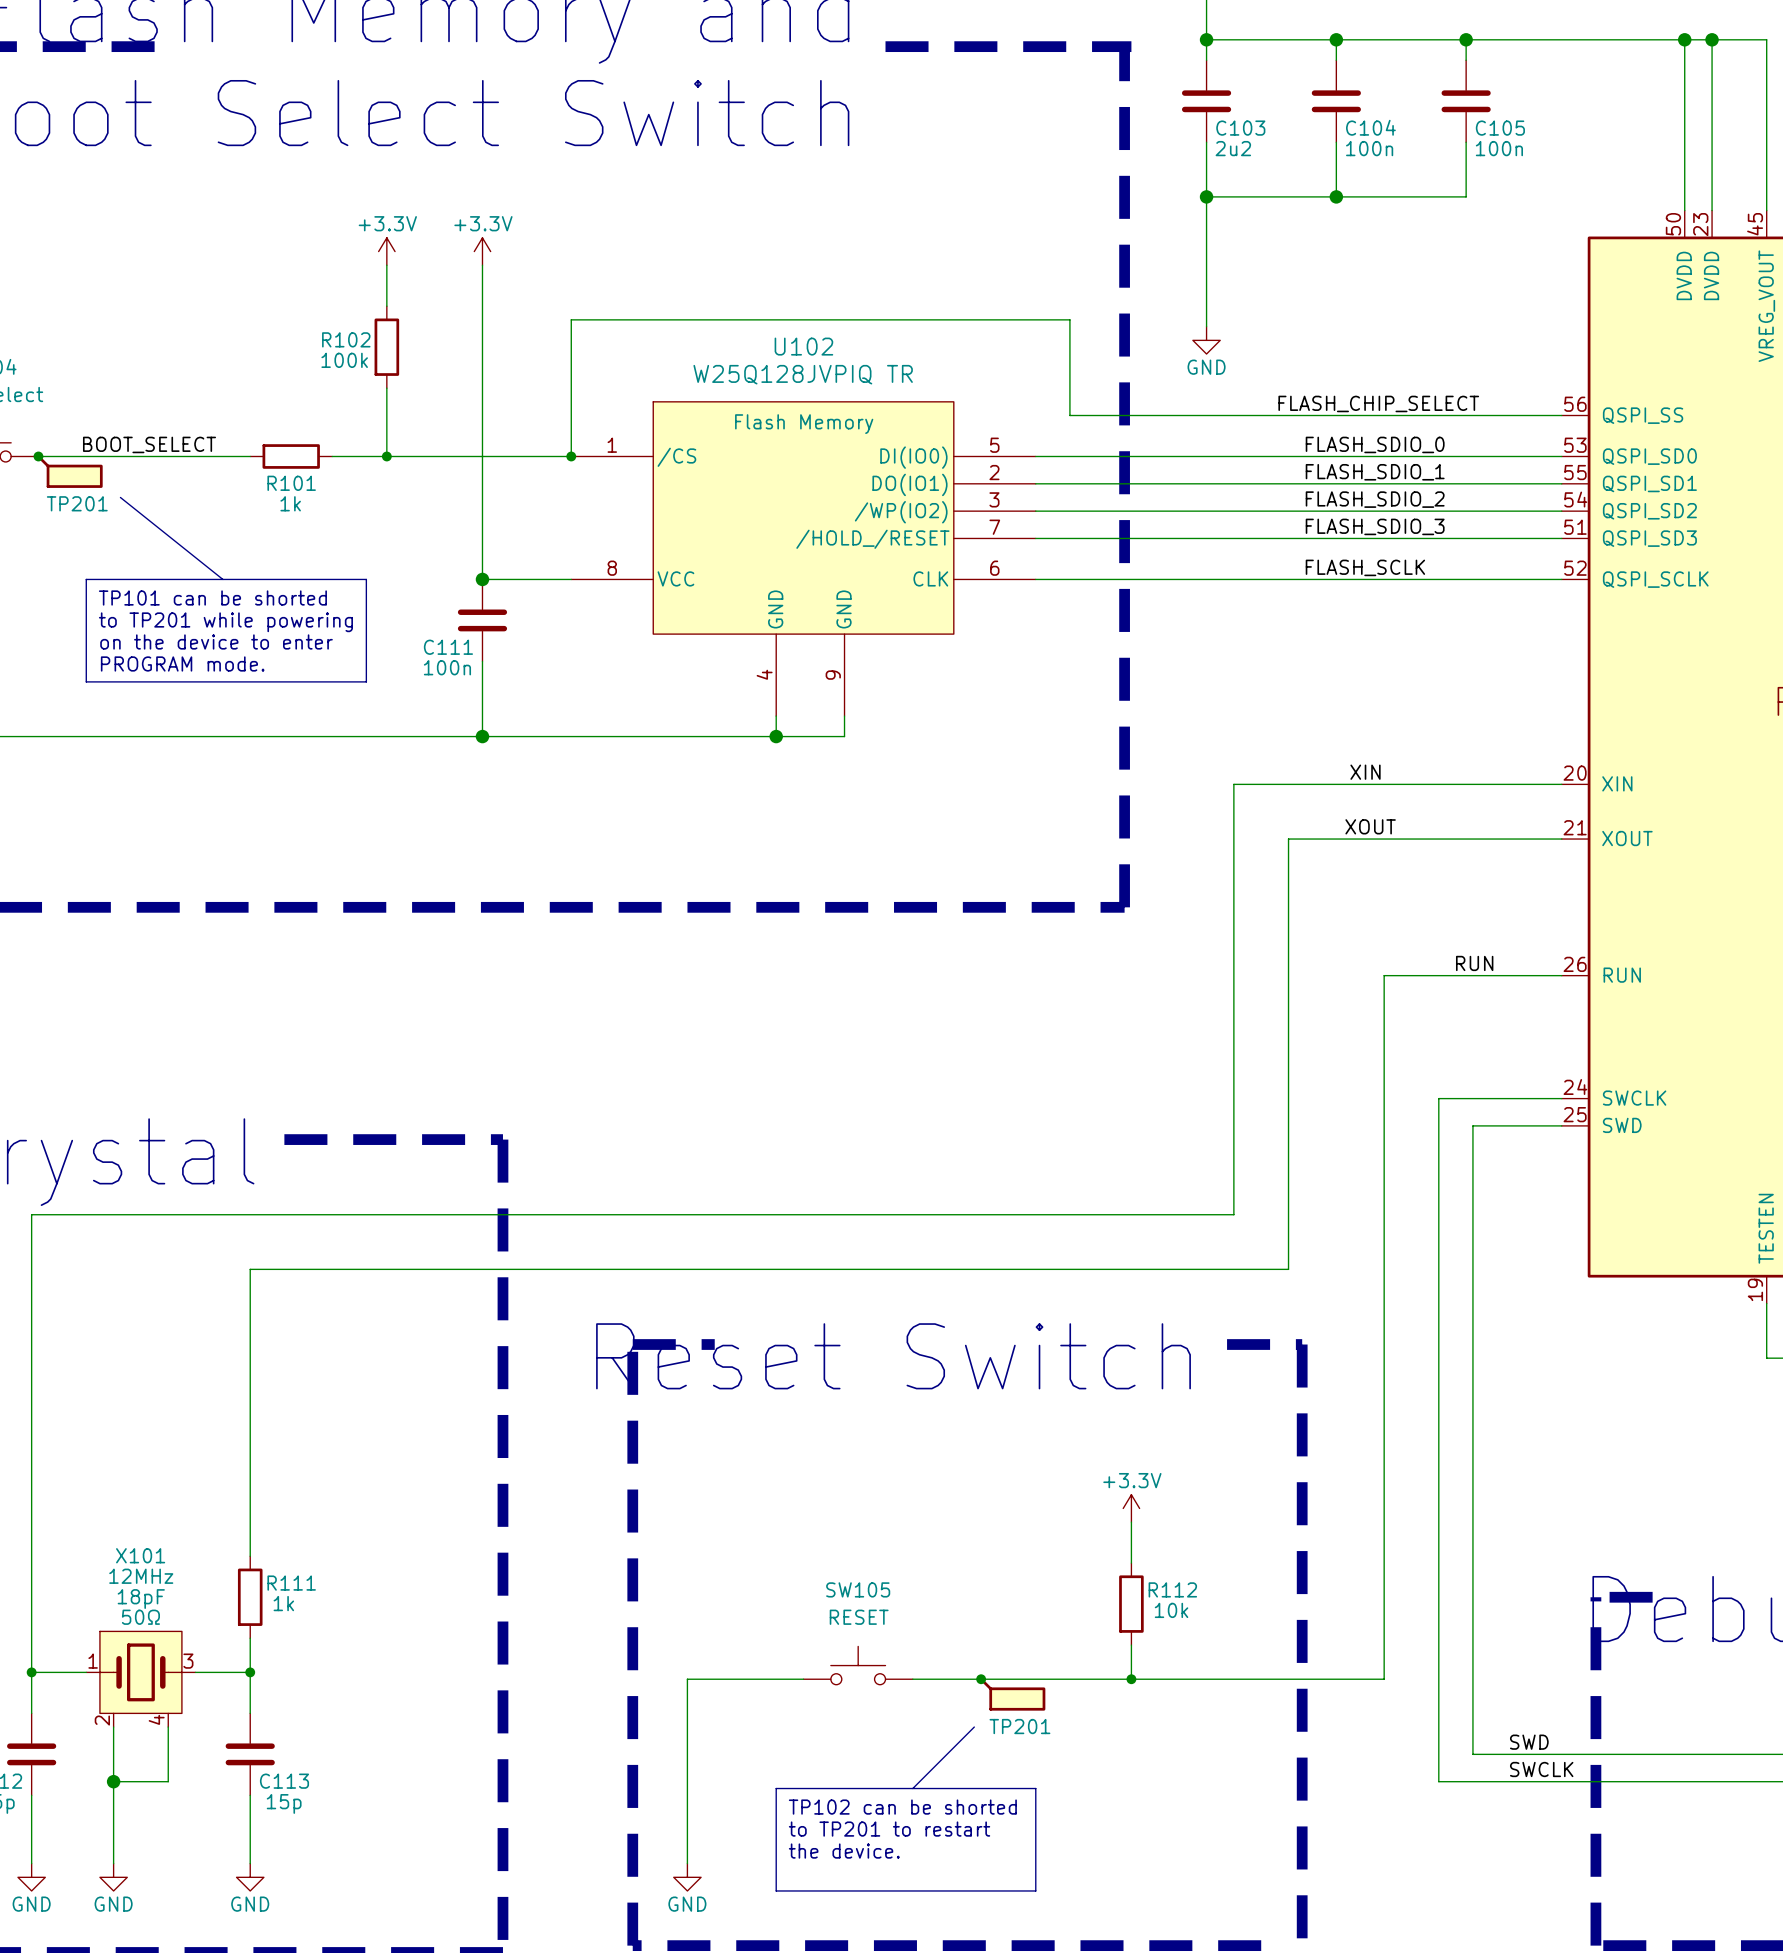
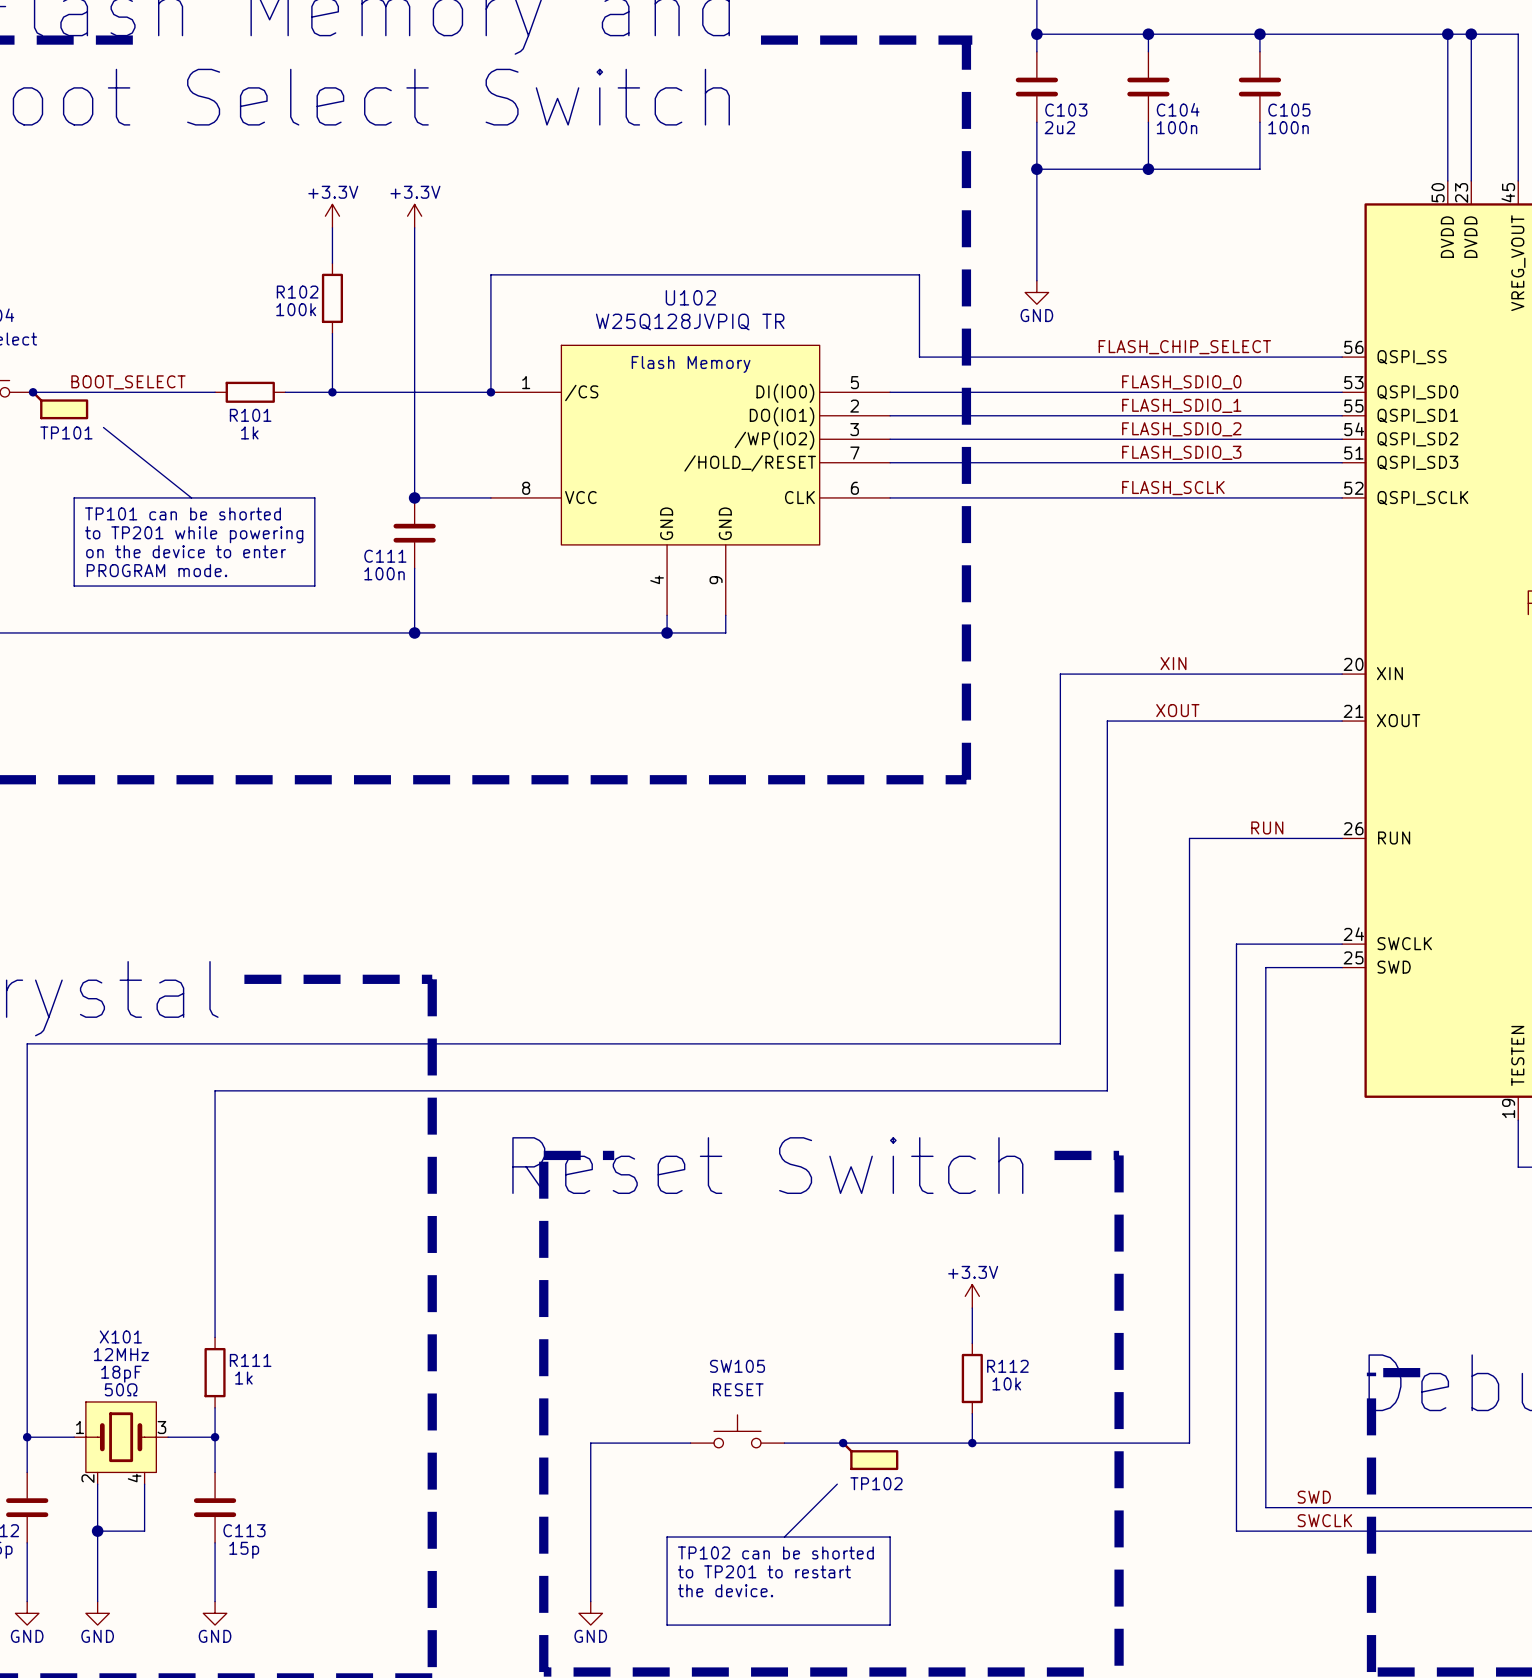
TP201 name: TP201 (77, 503) -> TP101 (66, 432)
TP201 name: TP201 (1019, 1726) -> TP102 (876, 1483)

